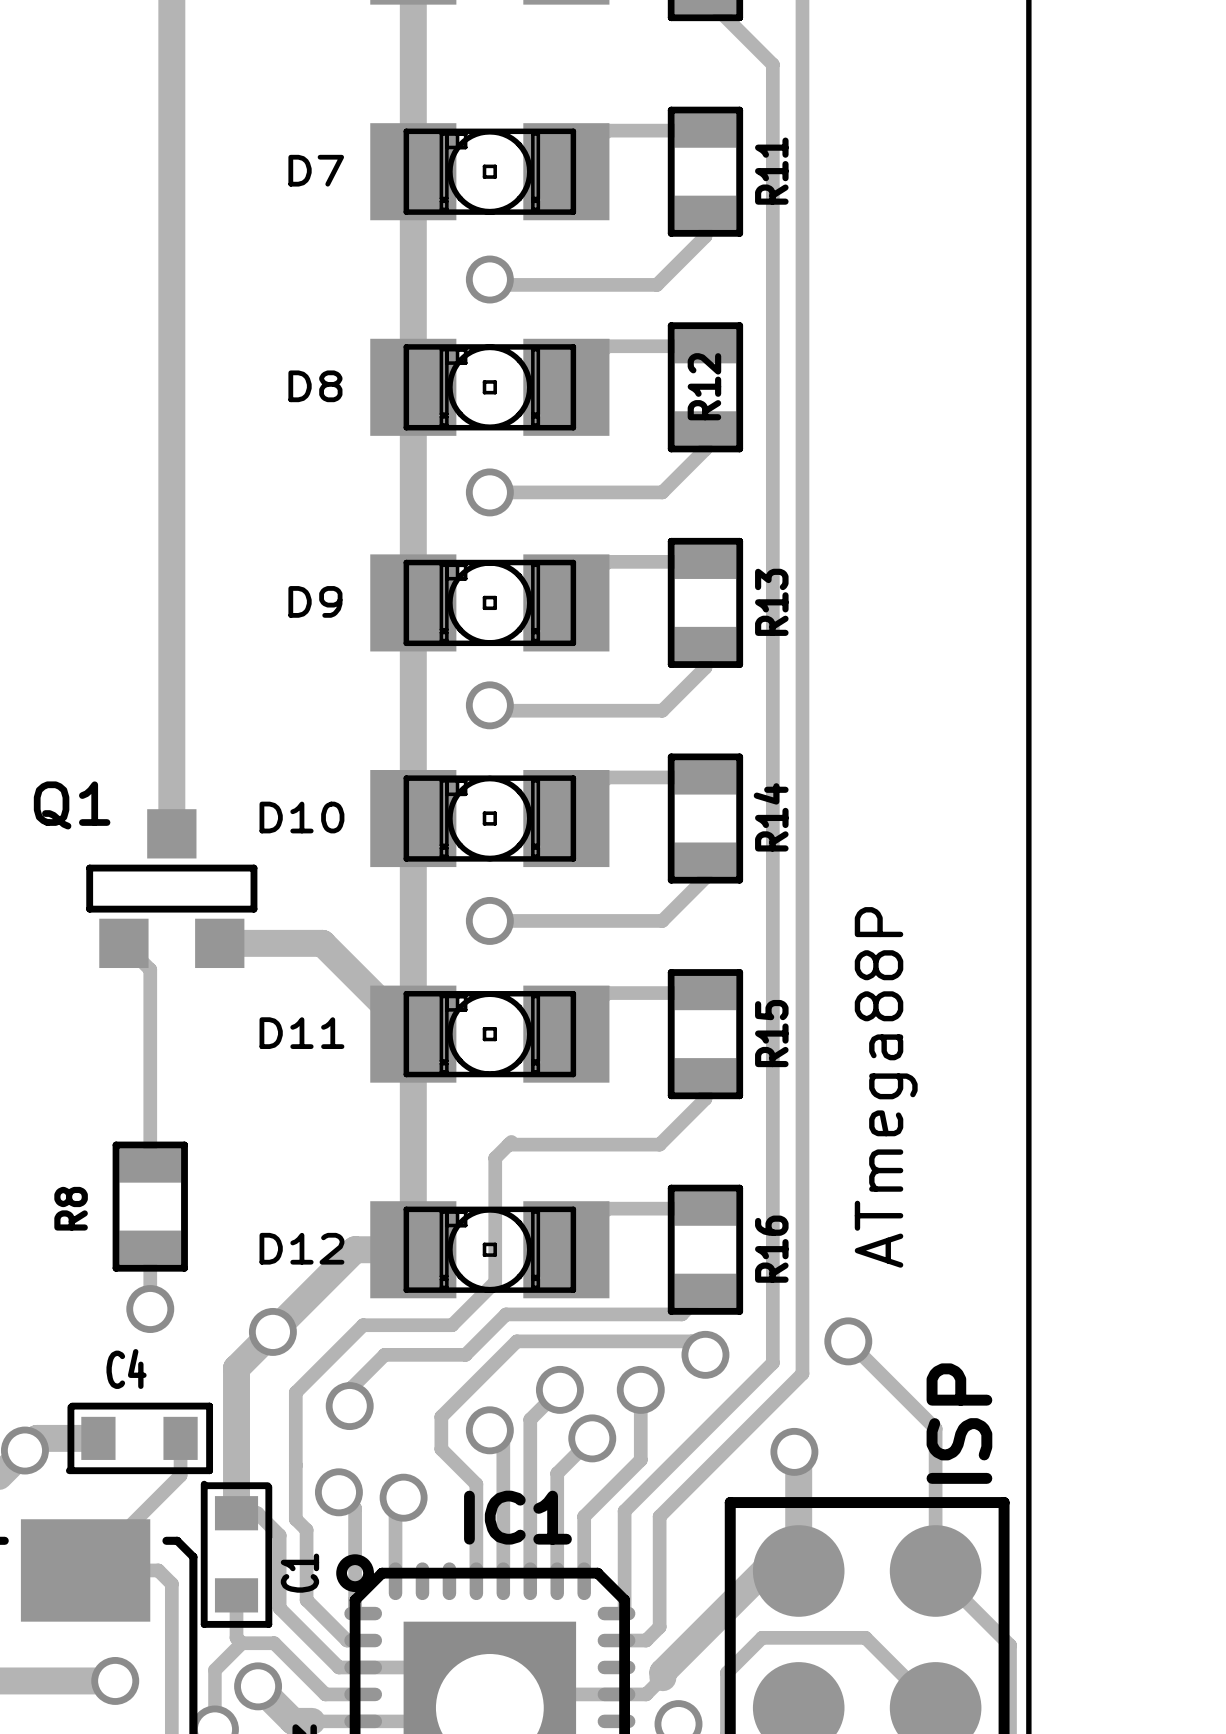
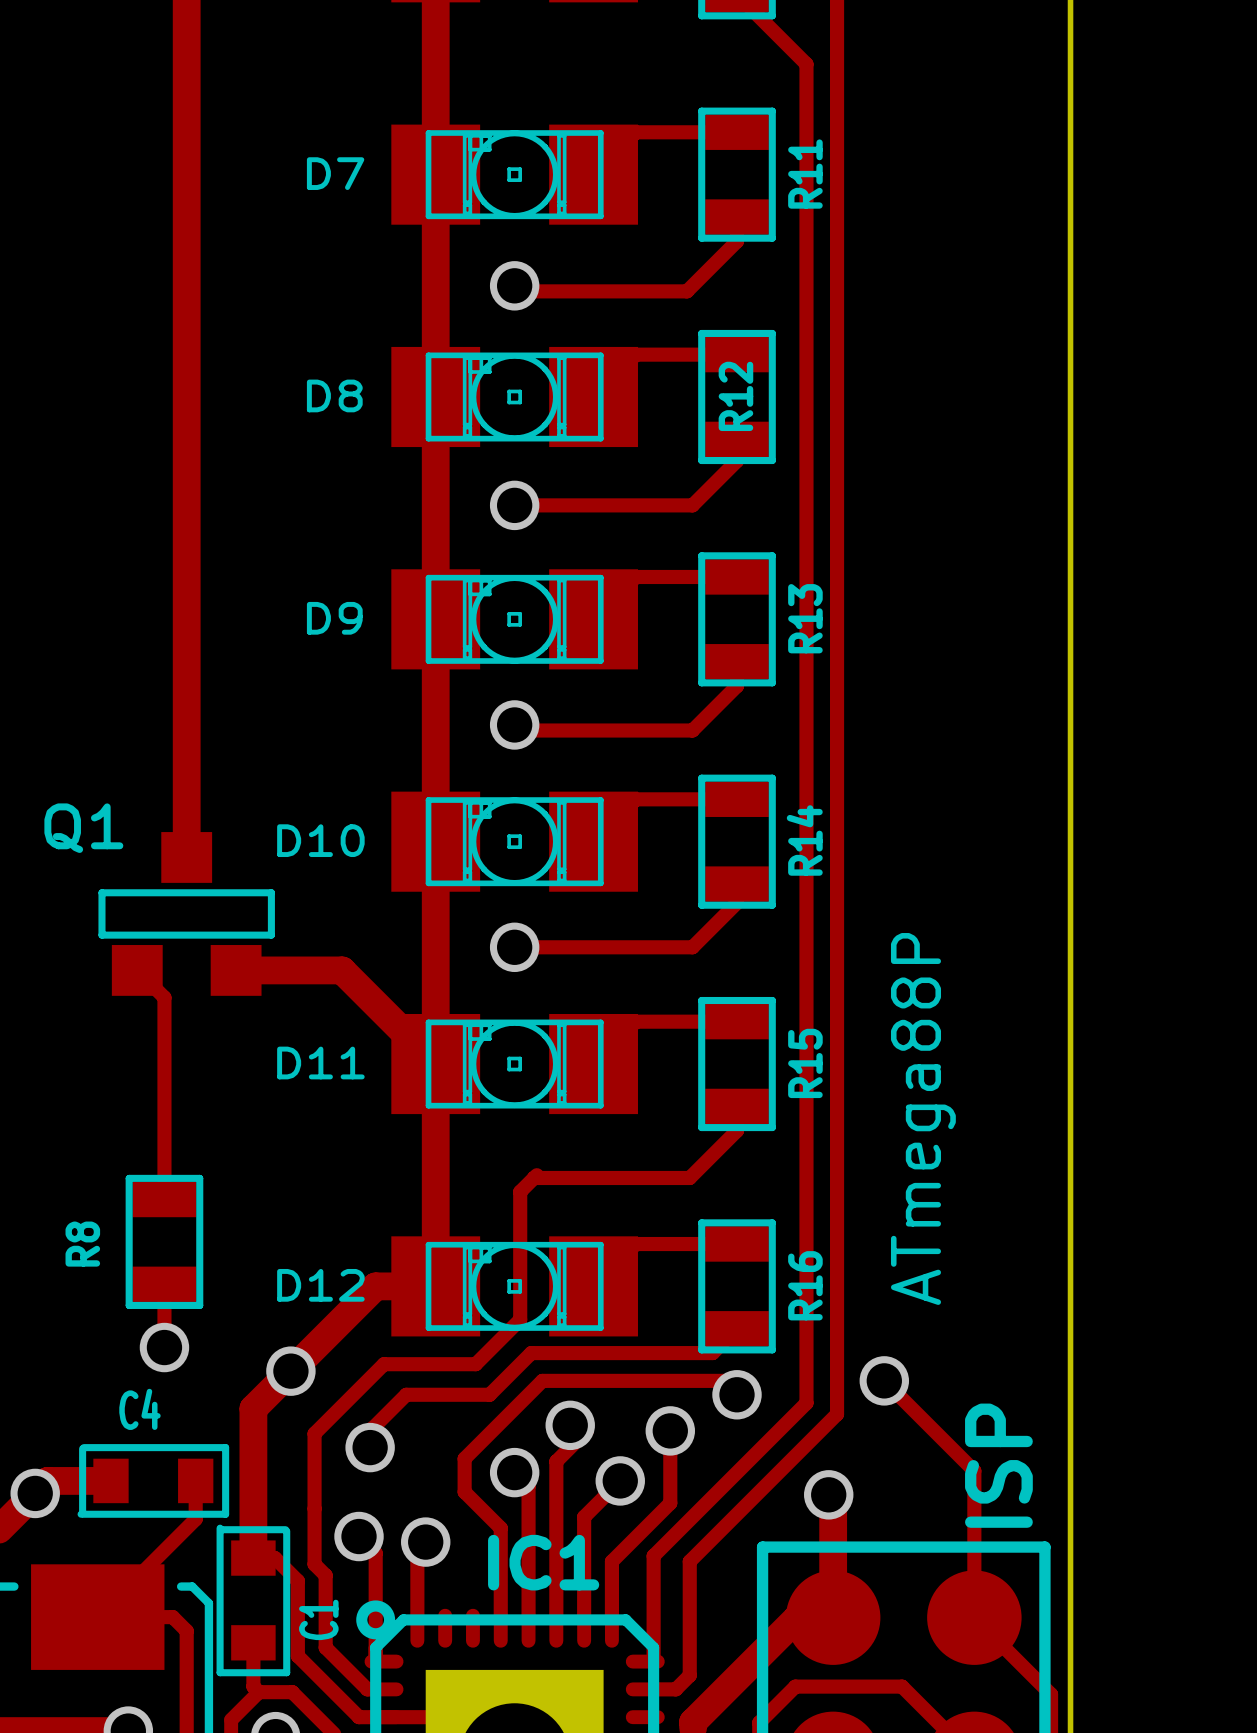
via position: (559, 1389) -> (570, 1425)

